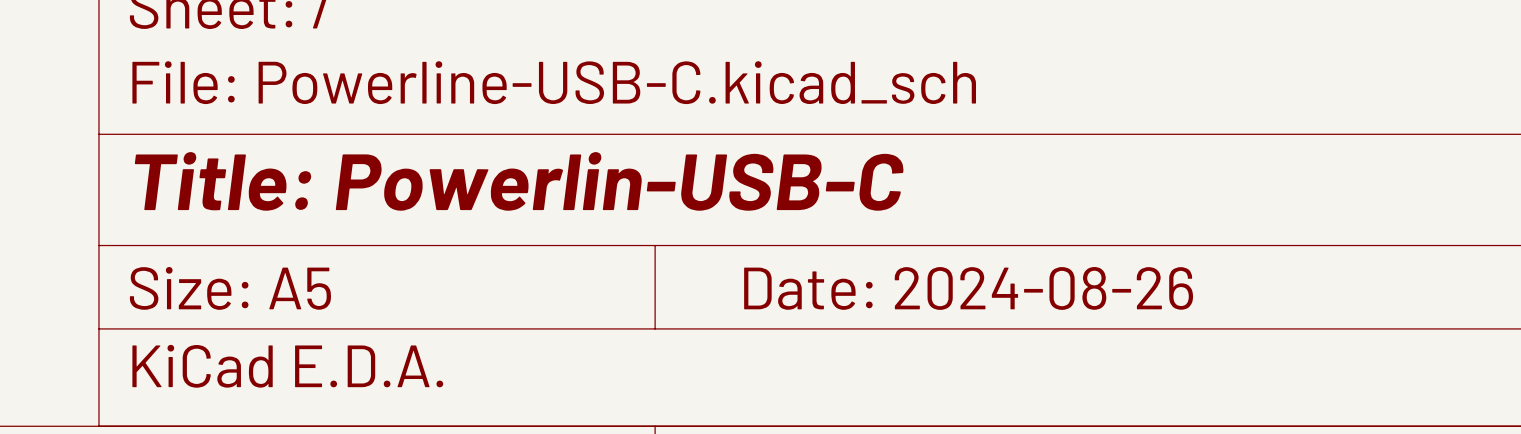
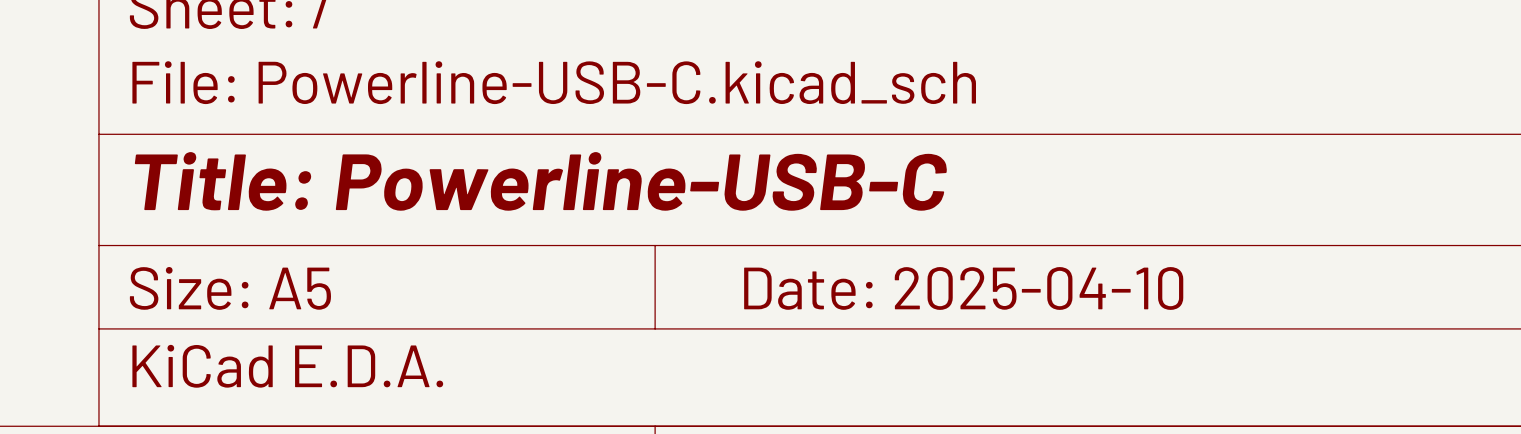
title block: Title: Powerlin-USB-C (519, 181) -> Title: Powerline-USB-C (541, 181)
title block: Date: 2024-08-26 (968, 288) -> Date: 2025-04-10 (963, 288)

